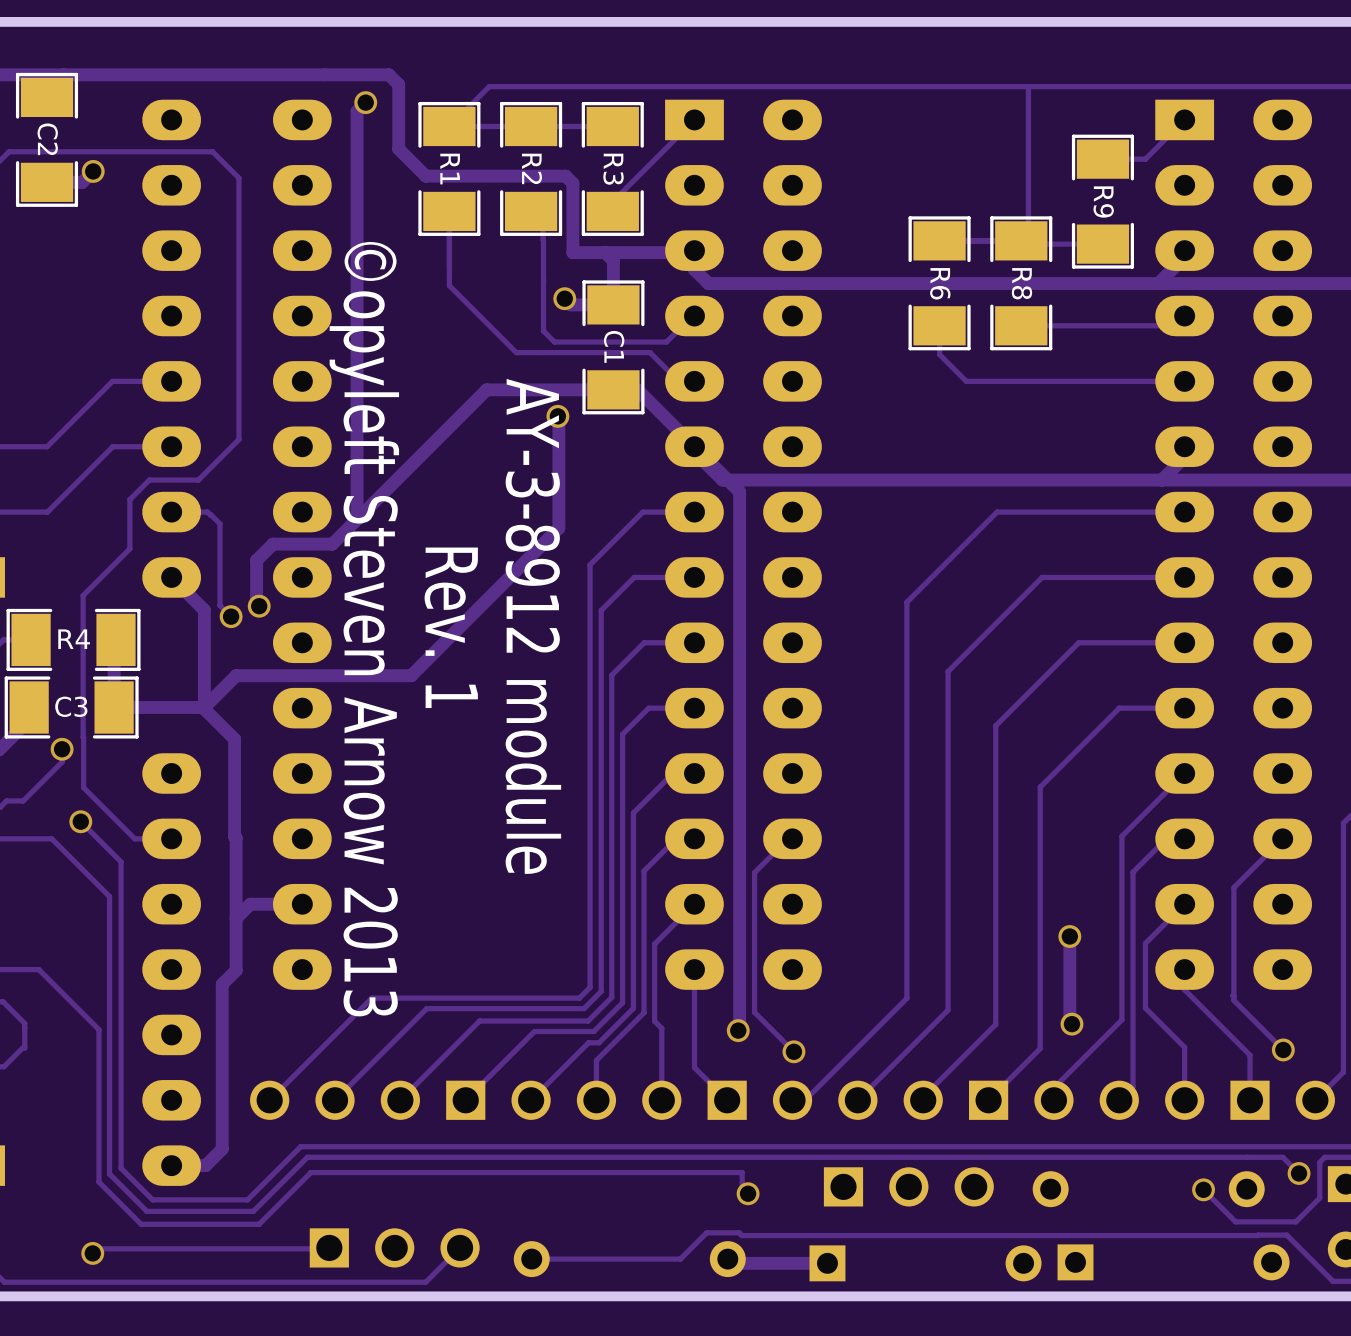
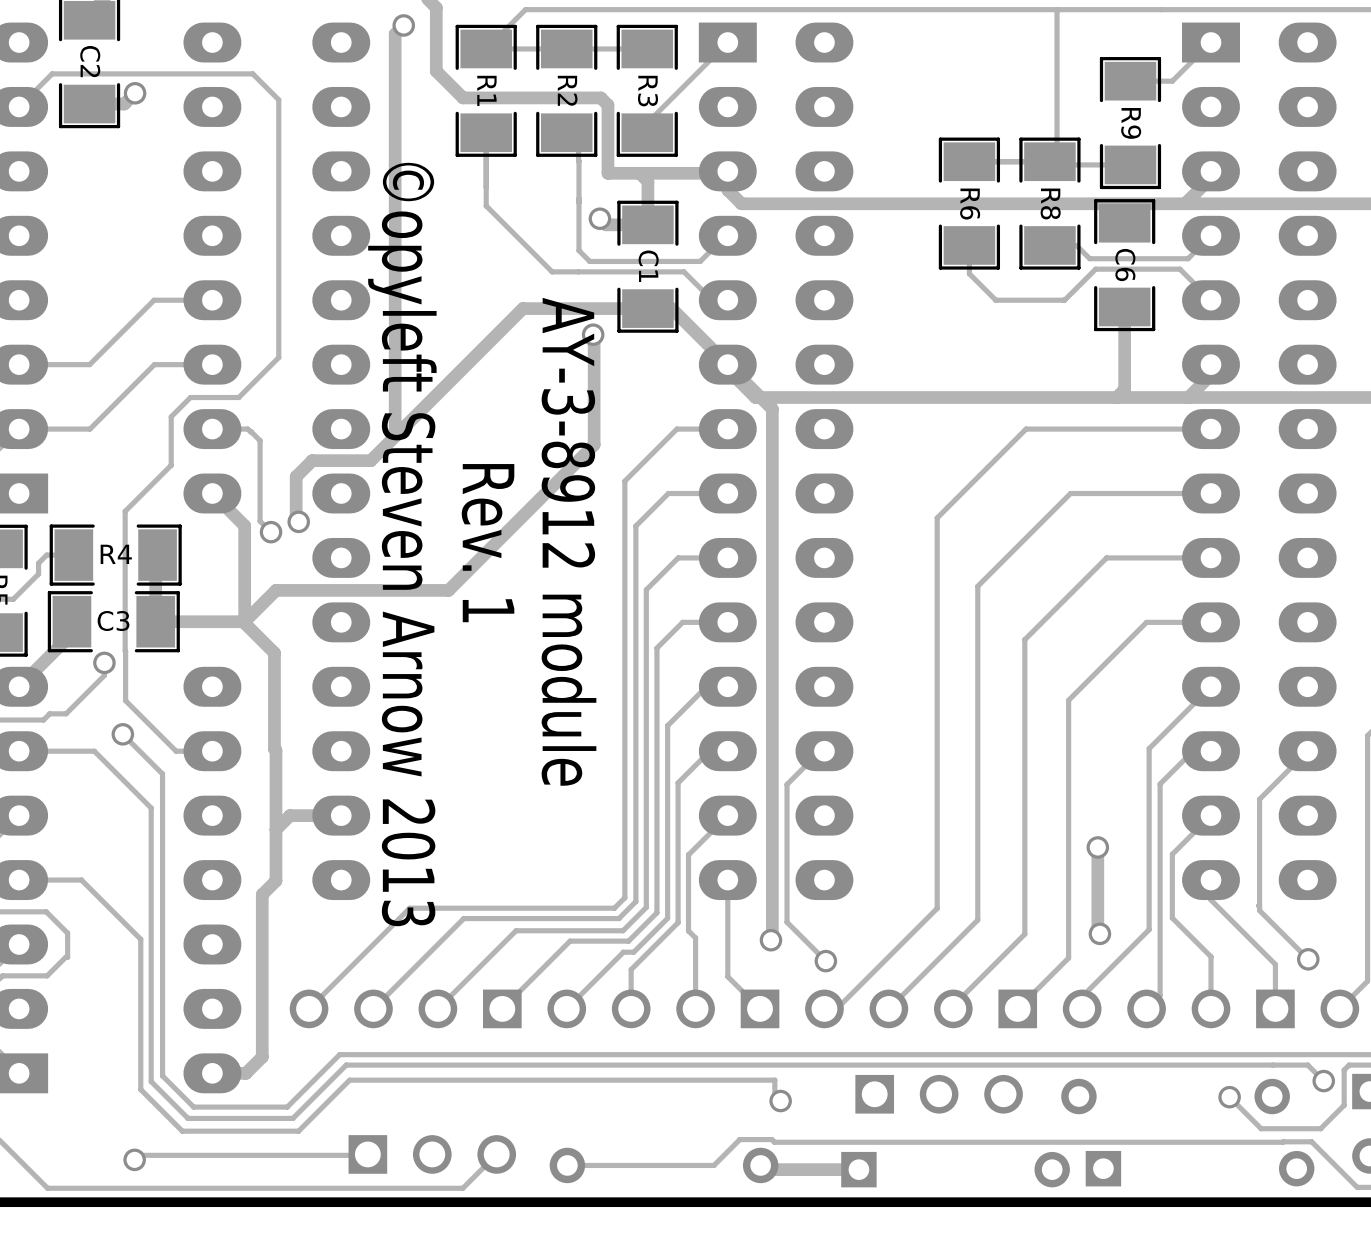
track: (1174, 325) (1048, 325) -> (1201, 245) (1188, 258) (1089, 258) (1076, 245)
C6: none -> (1124, 265)
track: (1184, 381) (1036, 381) -> (1211, 300) (1179, 269) (1095, 269) (1064, 300)
track: none -> (1124, 306) (1124, 389) (1116, 397)

